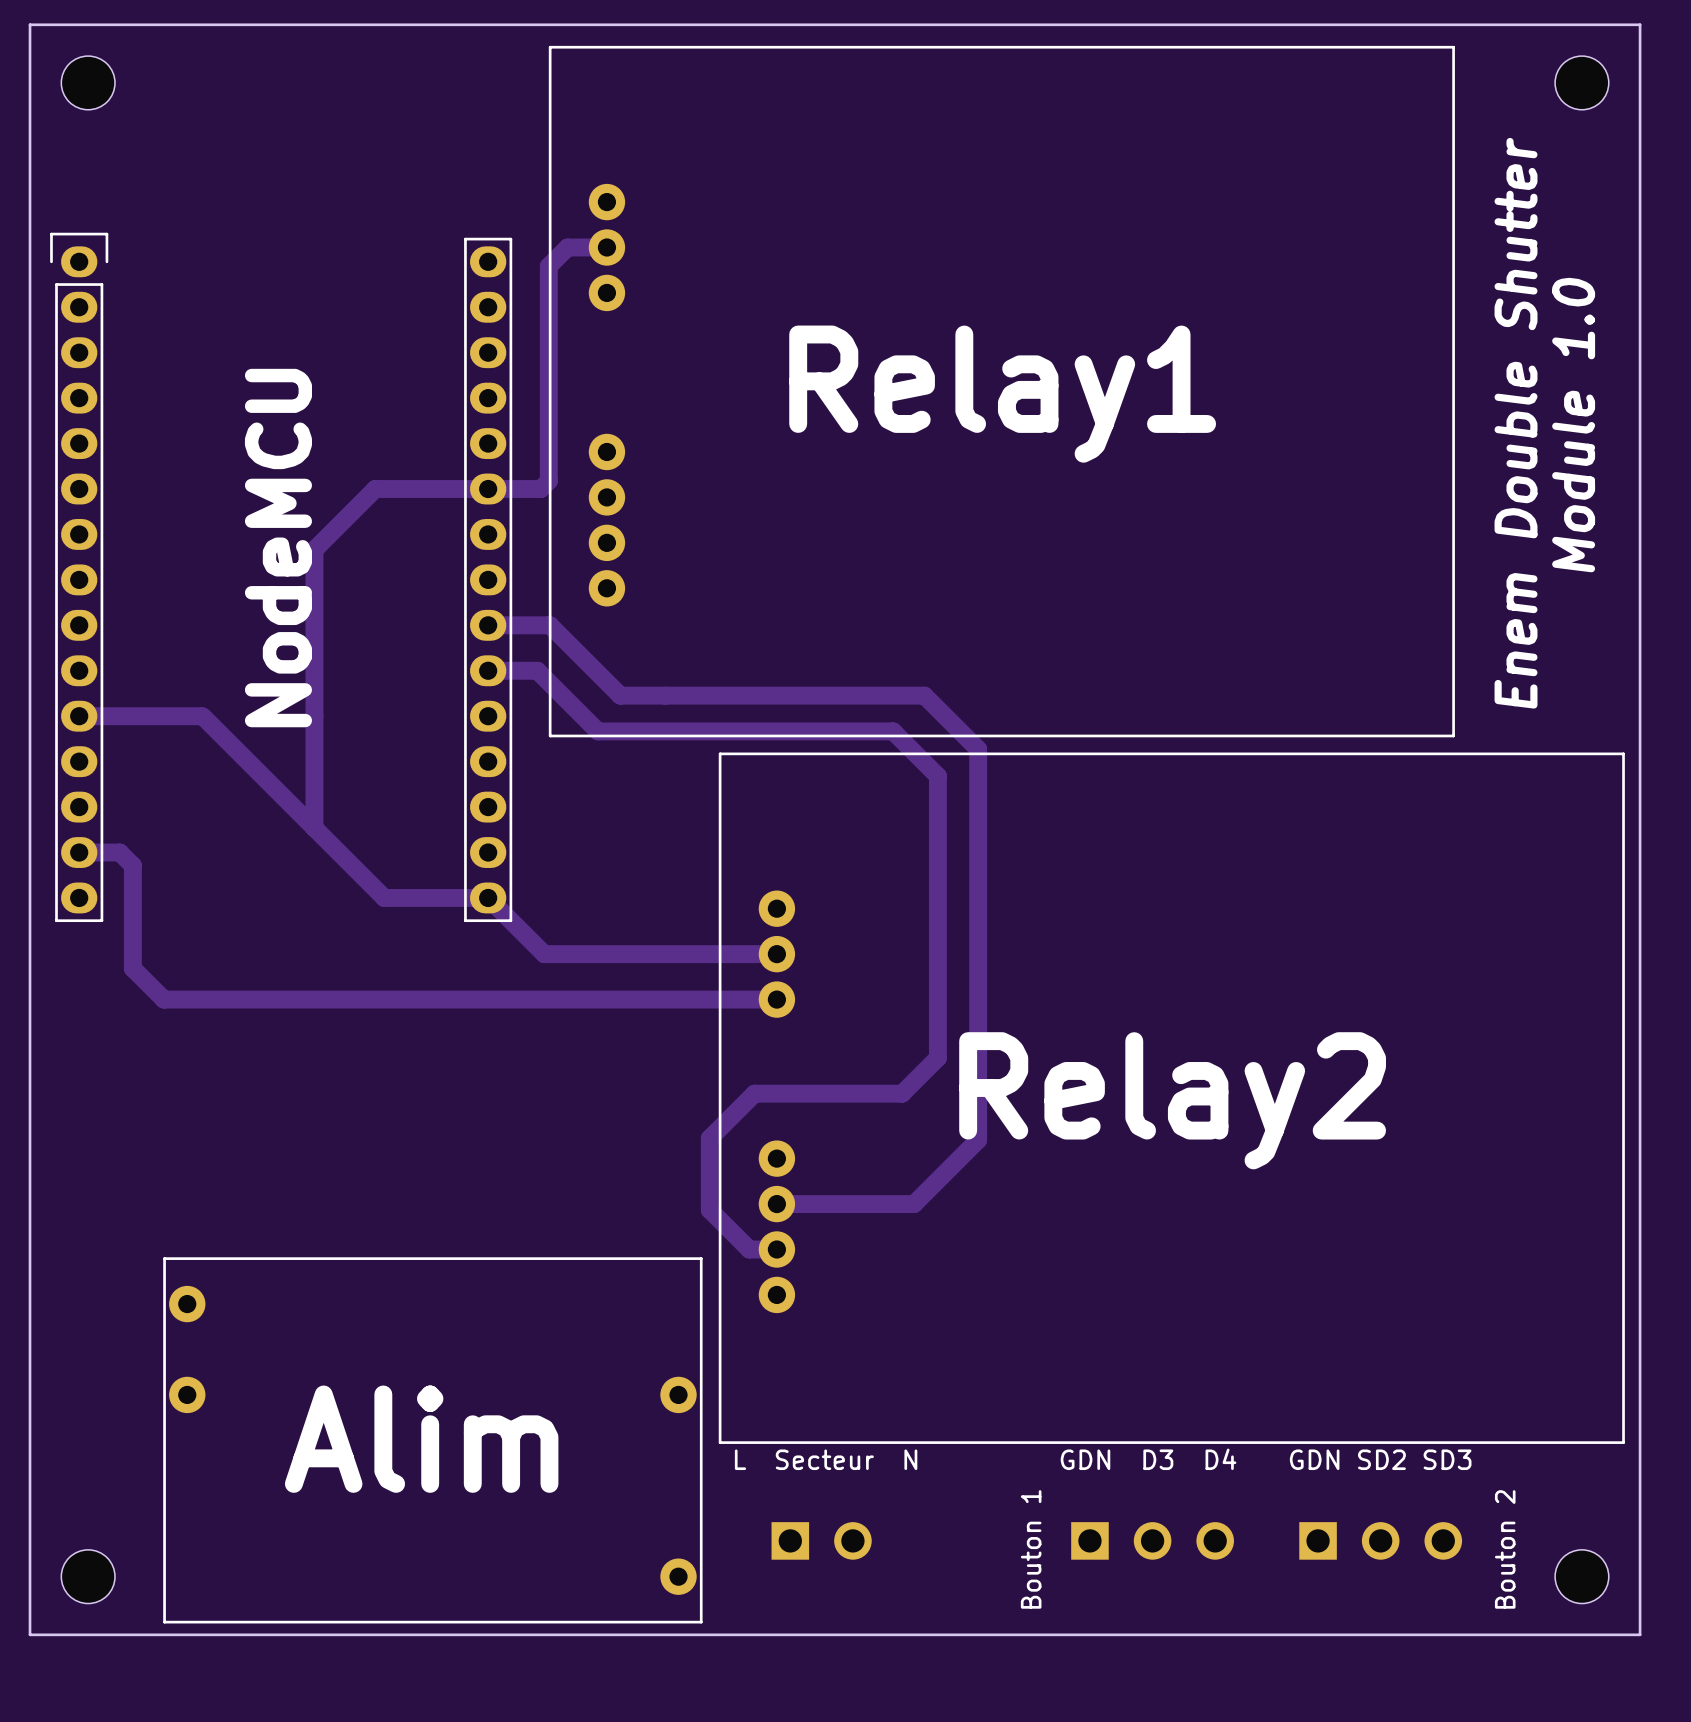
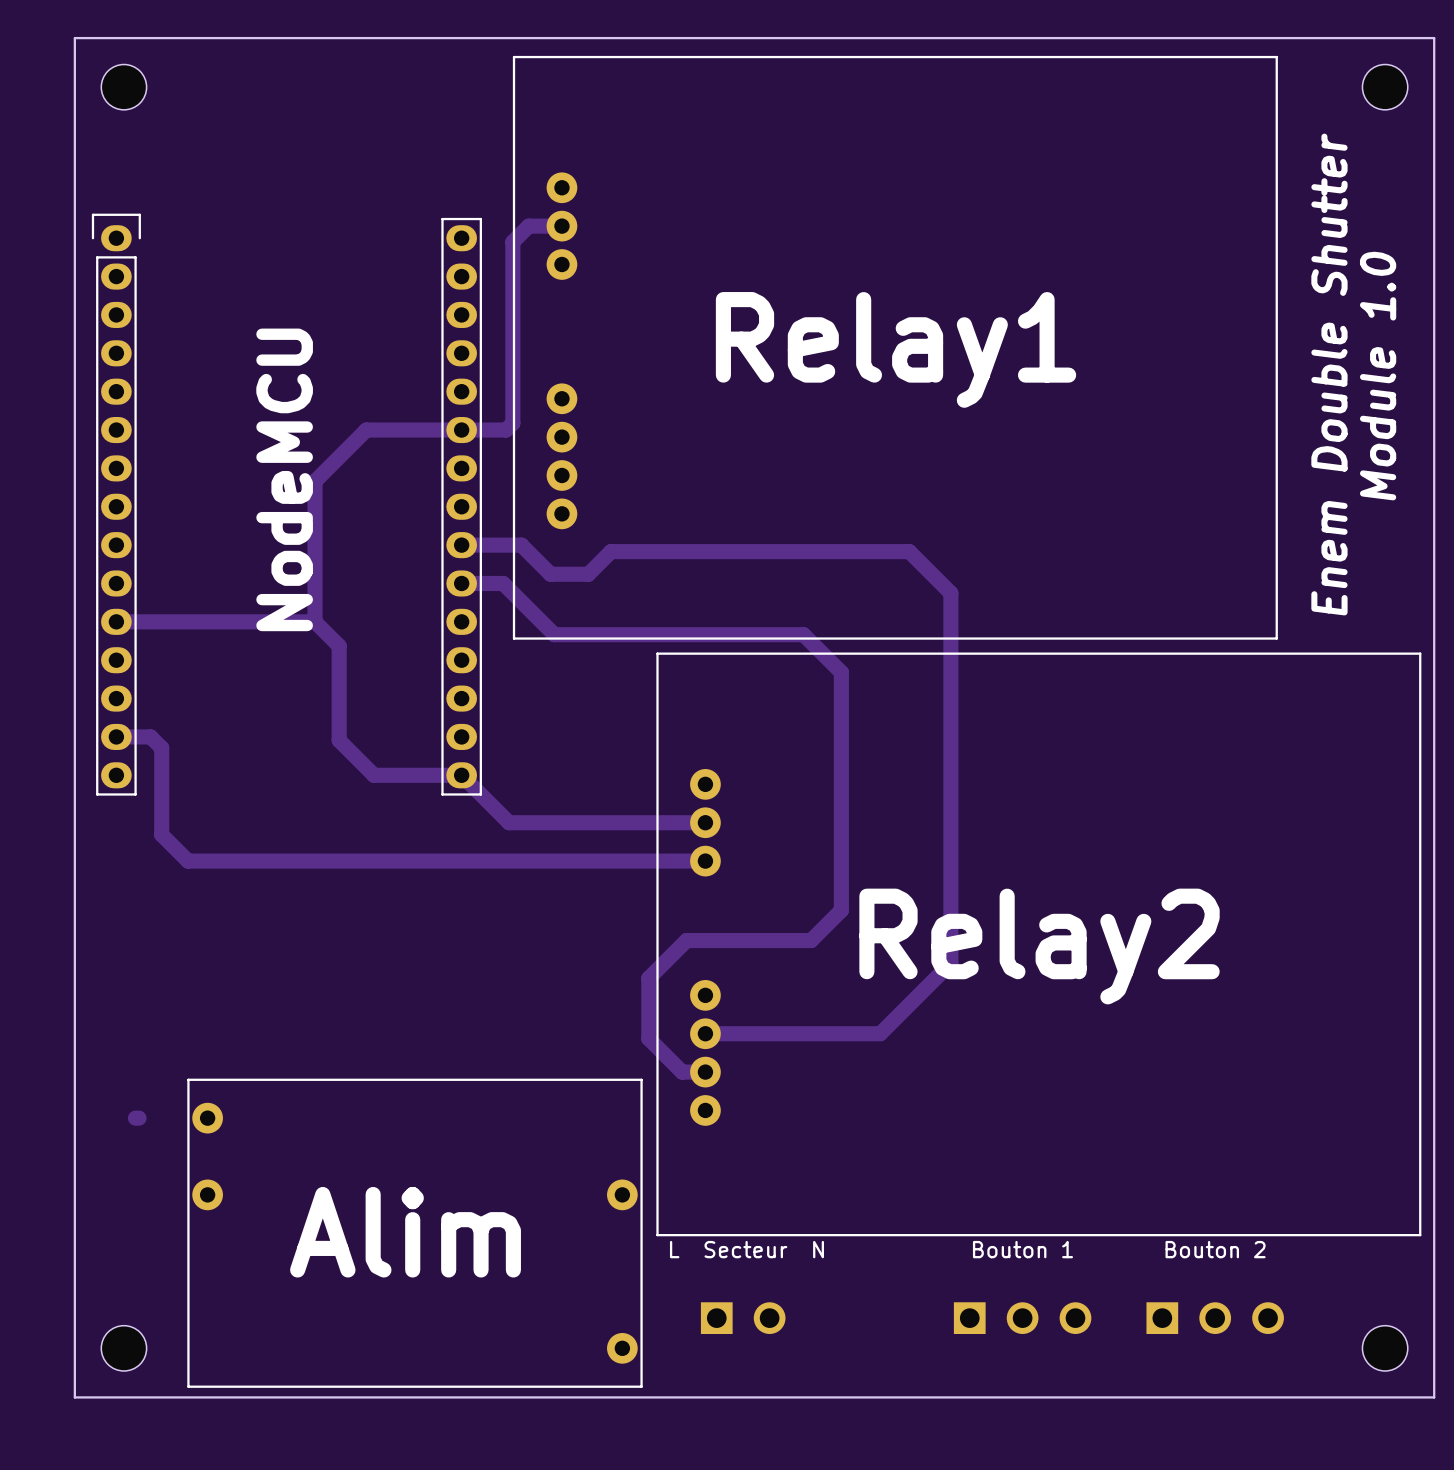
track: (550, 625) (620, 695) (924, 695) (978, 749) (978, 1140) (914, 1204) -> (513, 545) (521, 545) (550, 574) (588, 574) (611, 551) (909, 551) (950, 593) (950, 963) (880, 1033) (821, 1033)
track: (202, 716) (343, 856) -> (218, 621) (315, 621) (339, 646) (339, 740)
track: (314, 716) (314, 828) -> none
track: none -> (135, 1118) (139, 1118)
text: GDN D3 D4 (1148, 1459) -> none
text: GDN SD2 SD3 (1380, 1459) -> none
Bouton 1 name rotation: 0° (1031, 1549) -> 90° clockwise (1022, 1249)
Bouton 1 name position: Bouton 1 (1031, 1549) -> Bouton 1 (1022, 1249)
Bouton 2 name rotation: 0° (1505, 1549) -> 90° clockwise (1215, 1249)
Bouton 2 name position: Bouton 2 (1505, 1549) -> Bouton 2 (1215, 1249)

